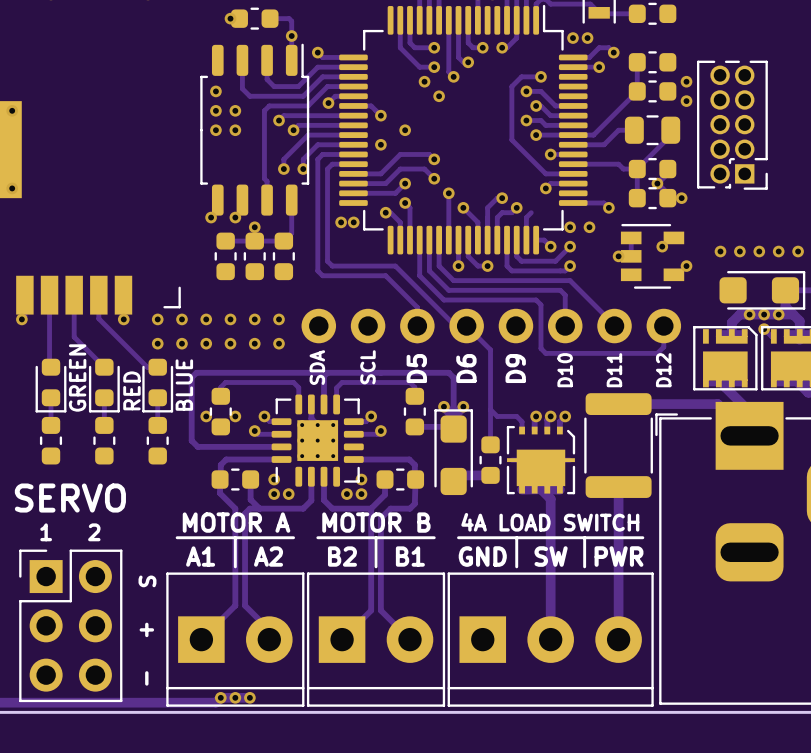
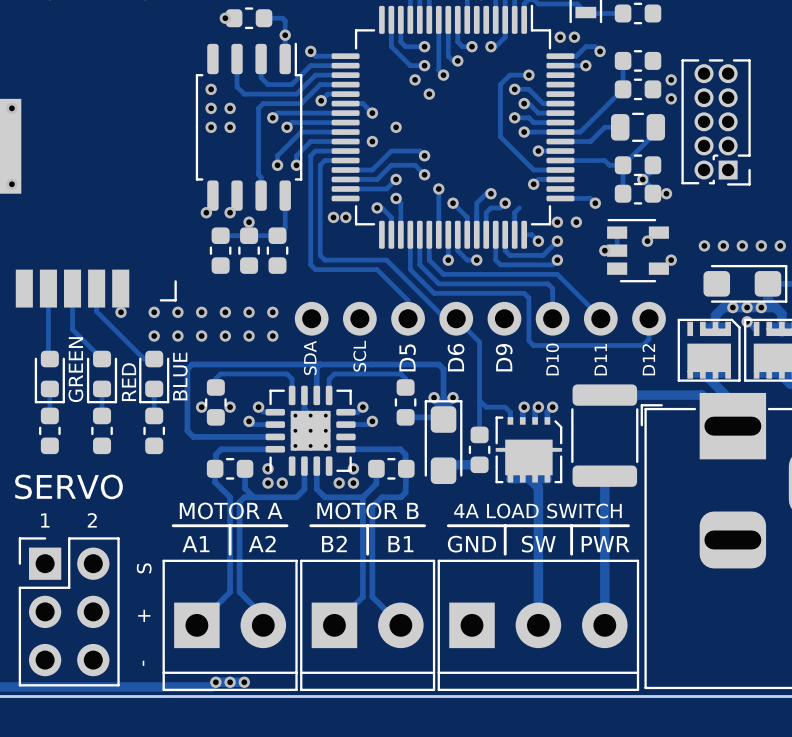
via: (21, 319) -> none

